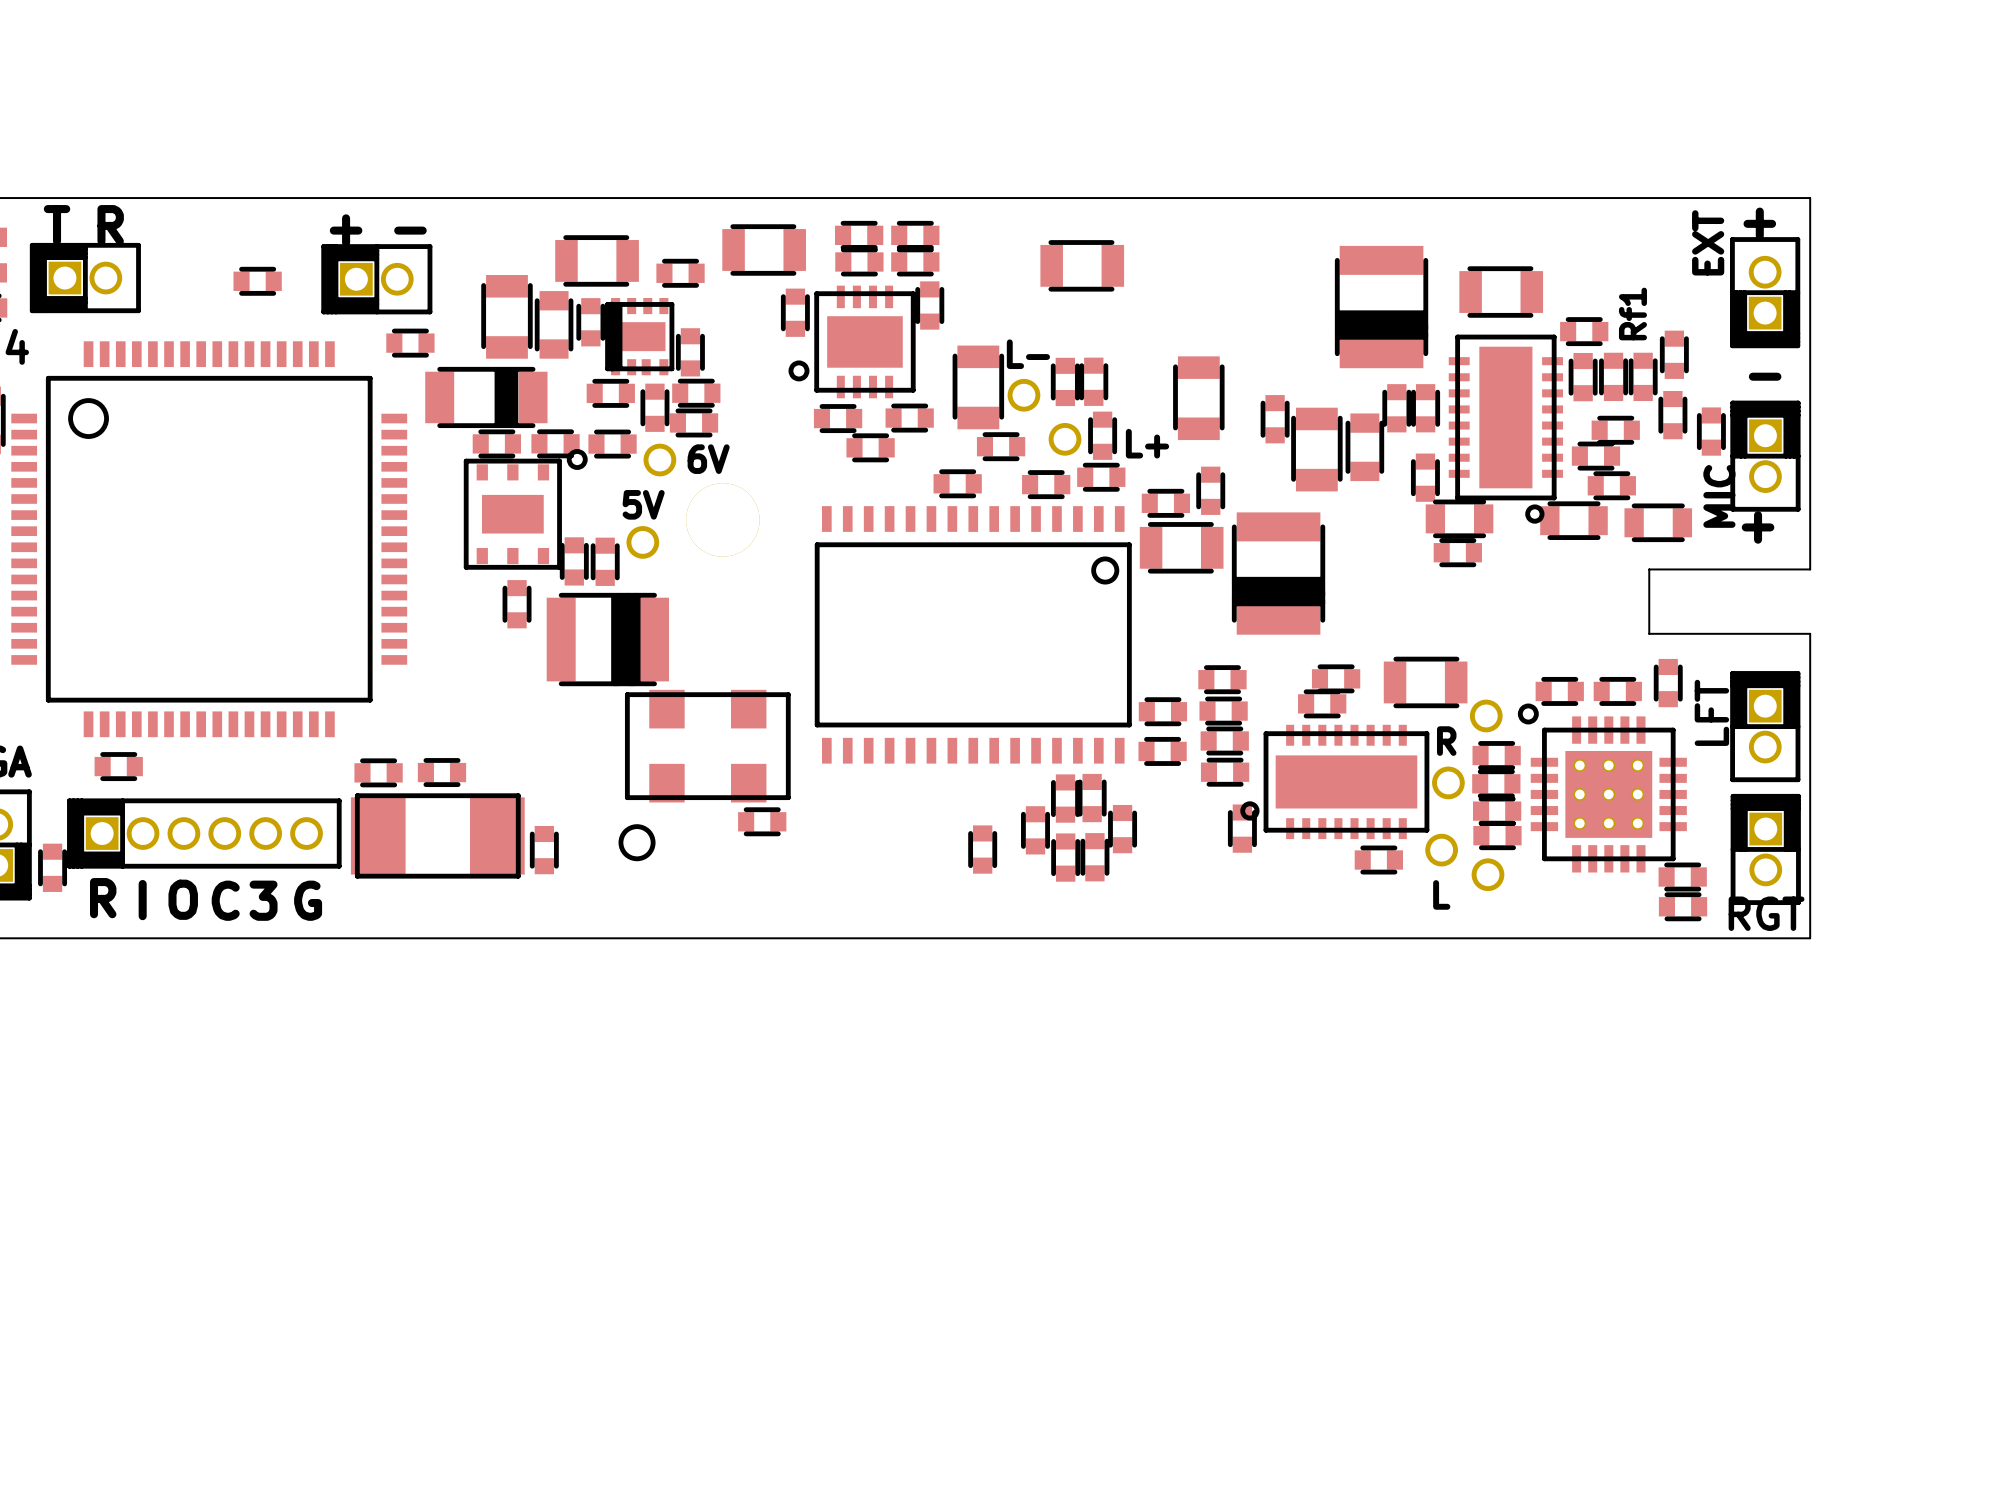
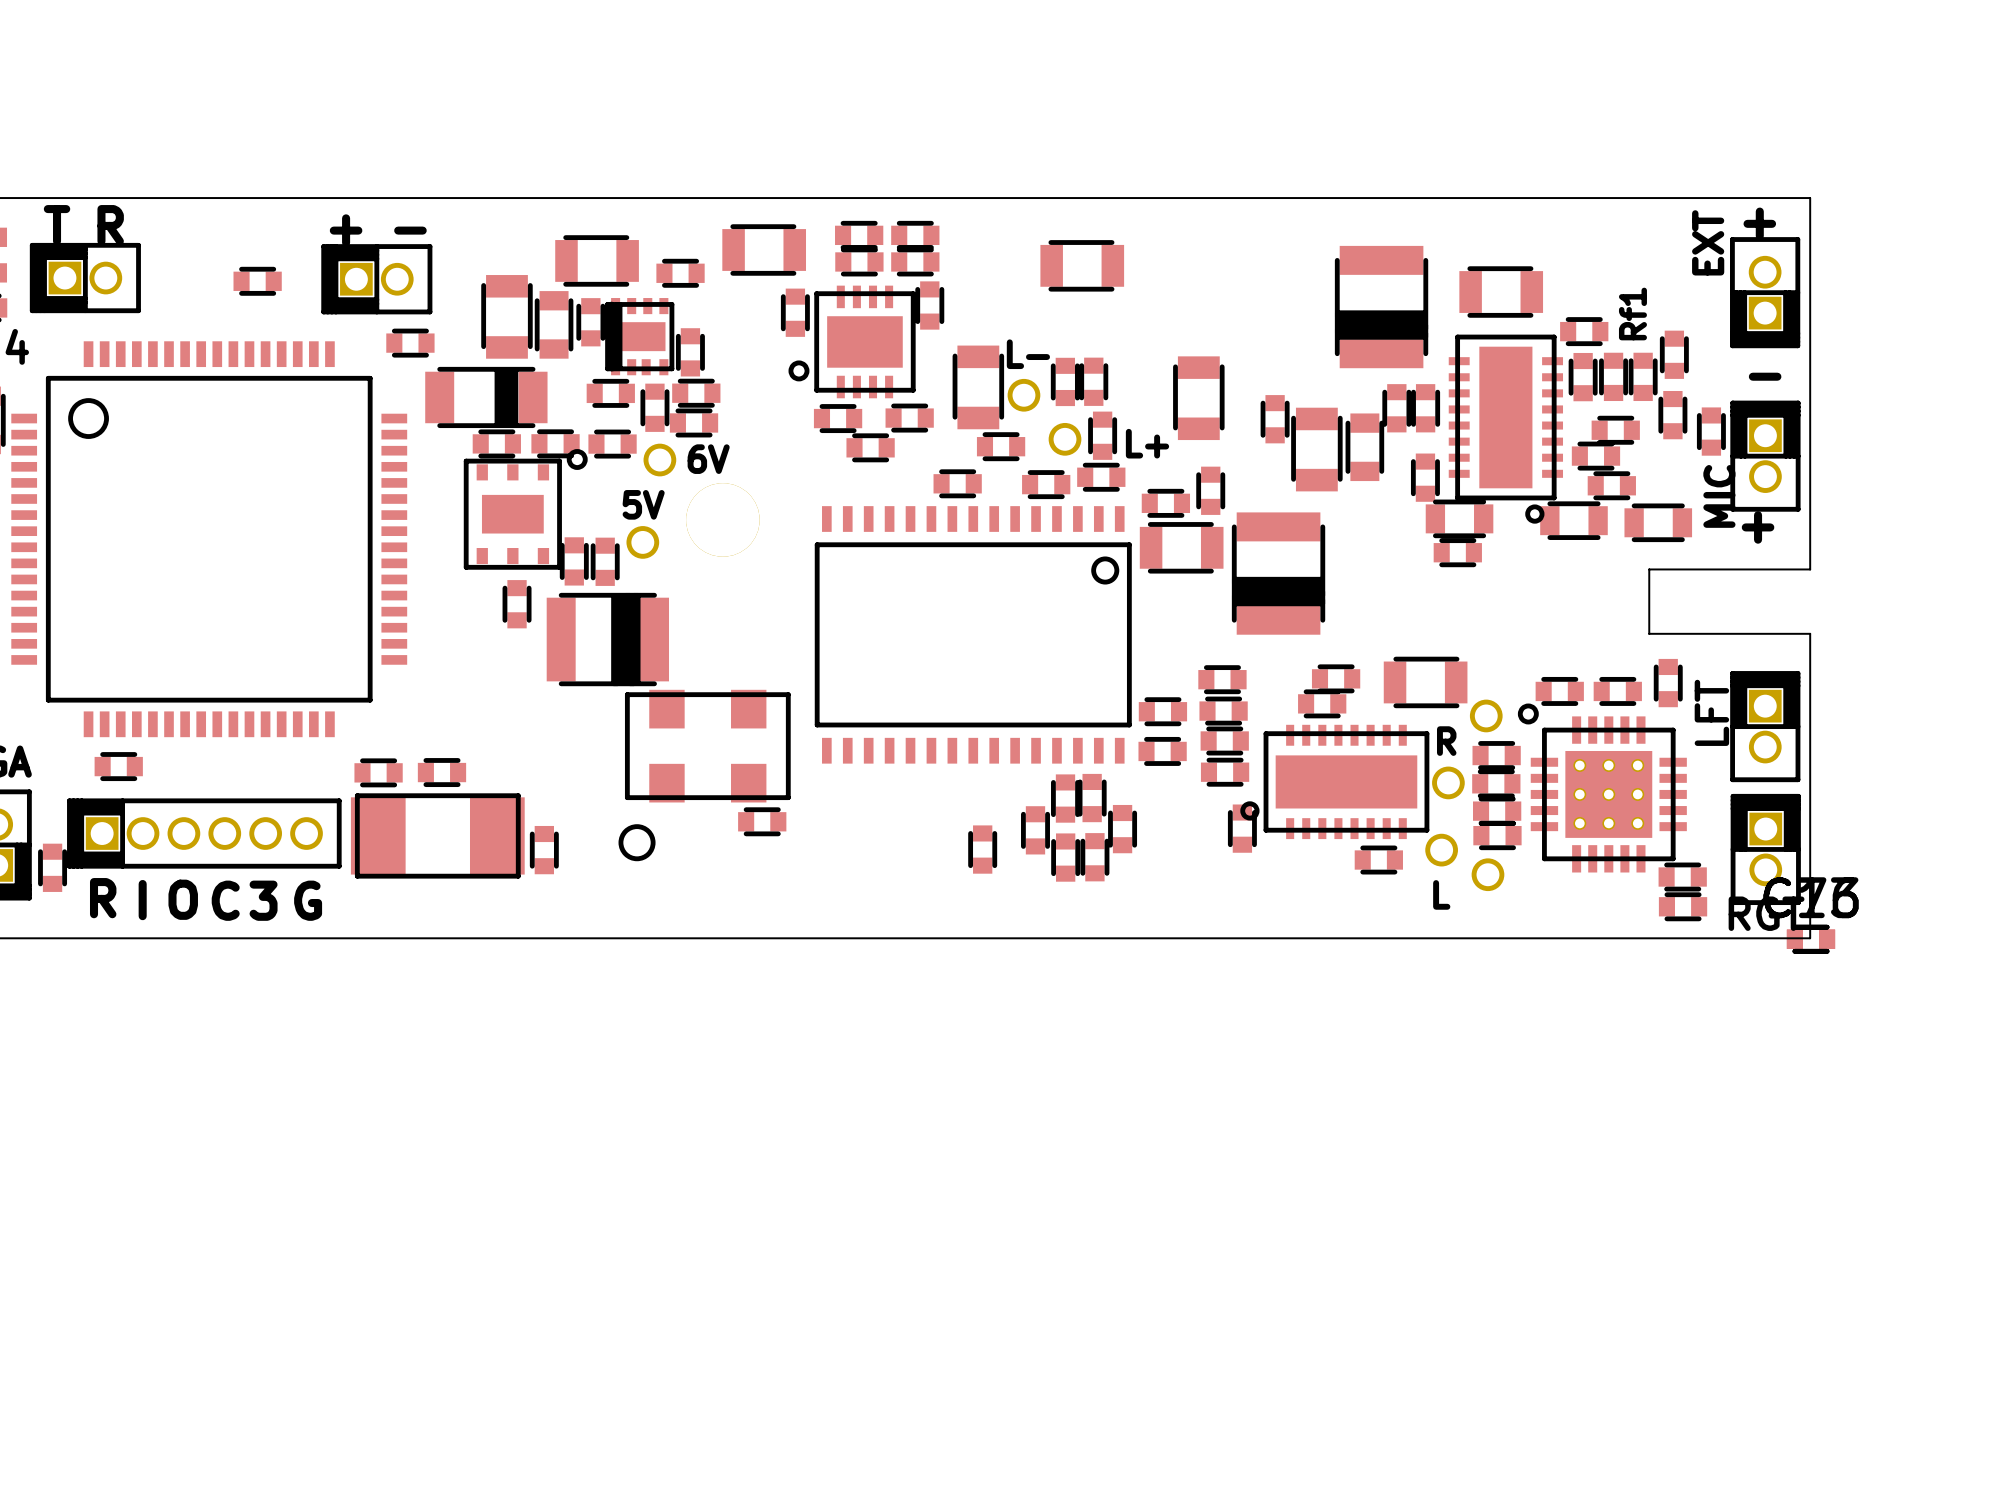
part: none -> (1810, 939)
part: none -> (1810, 939)

